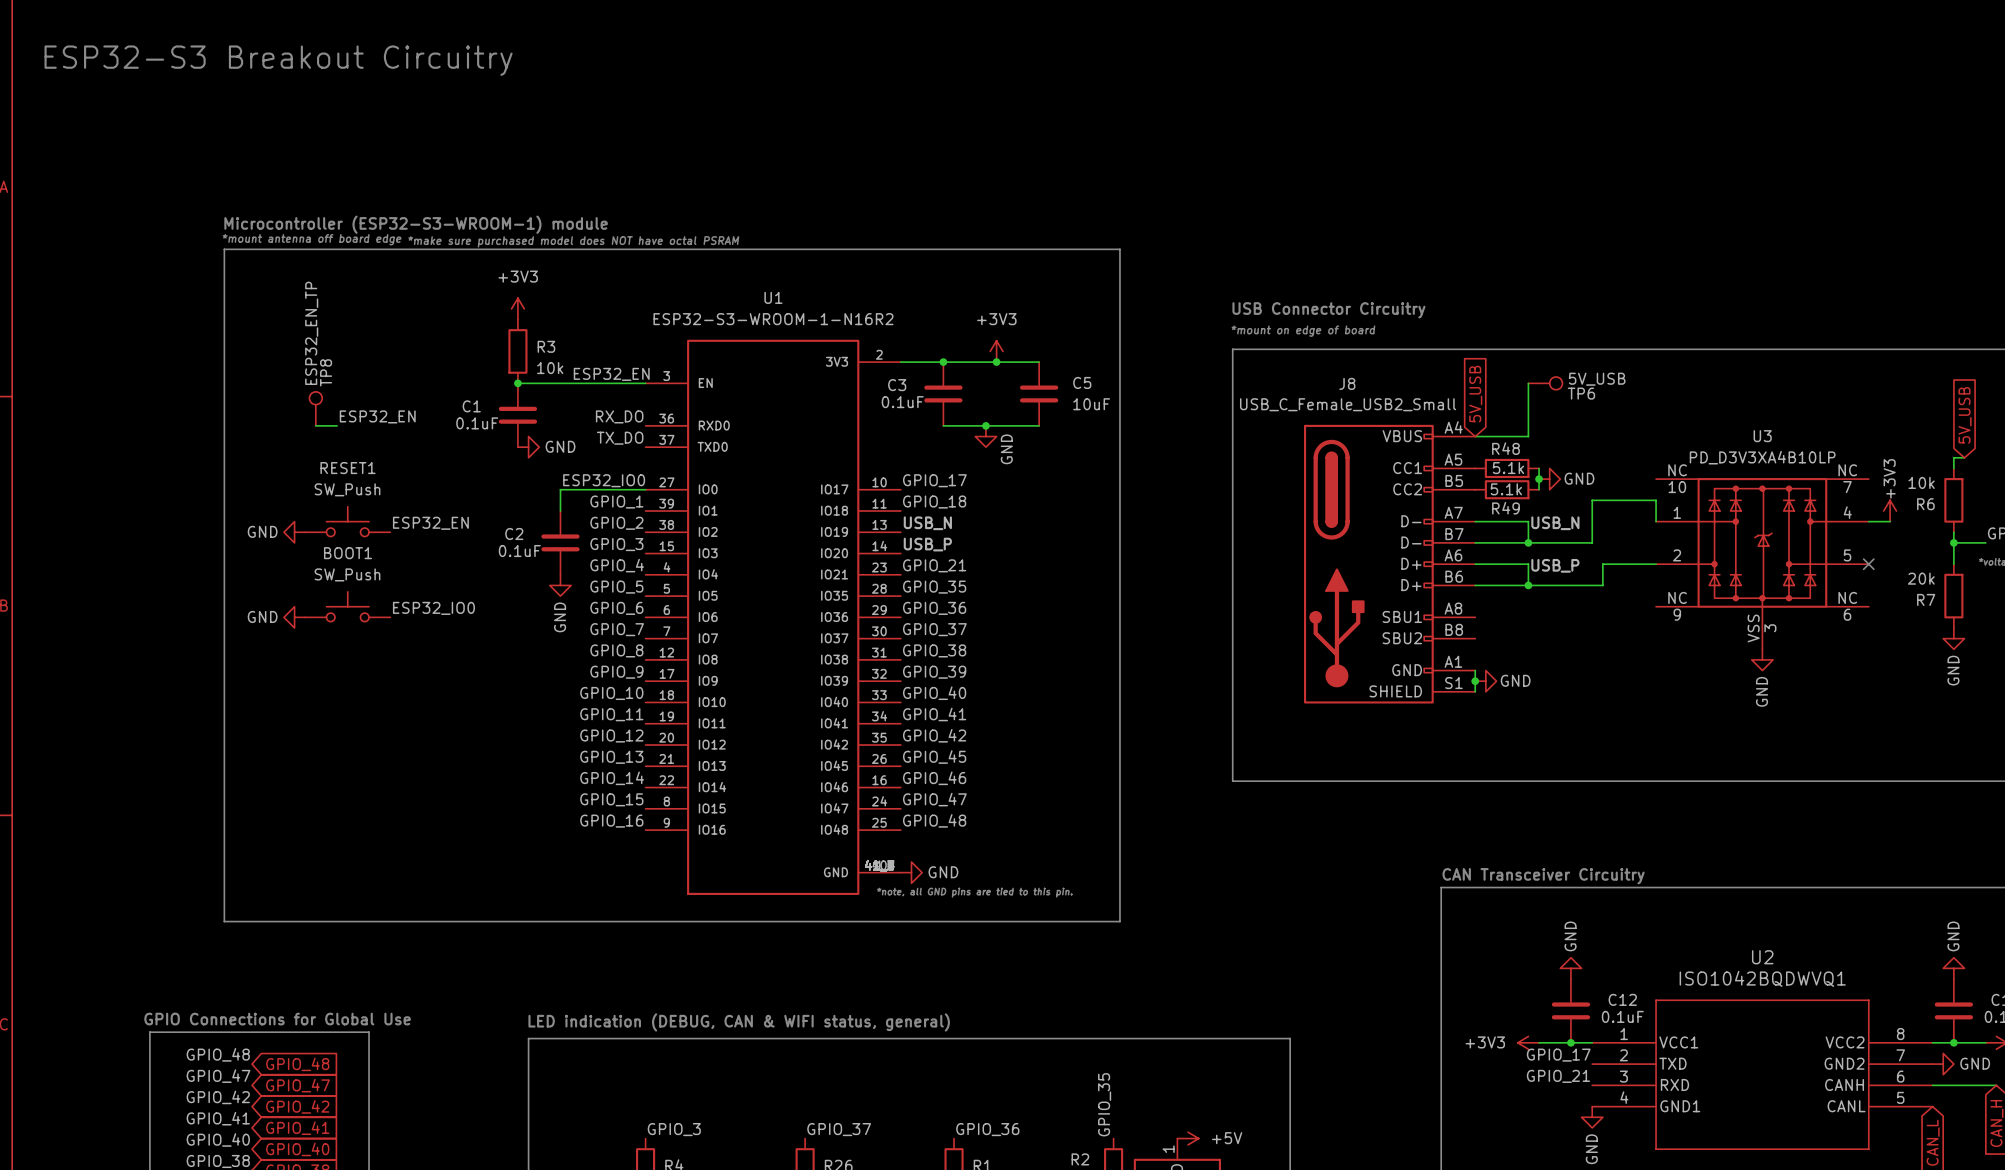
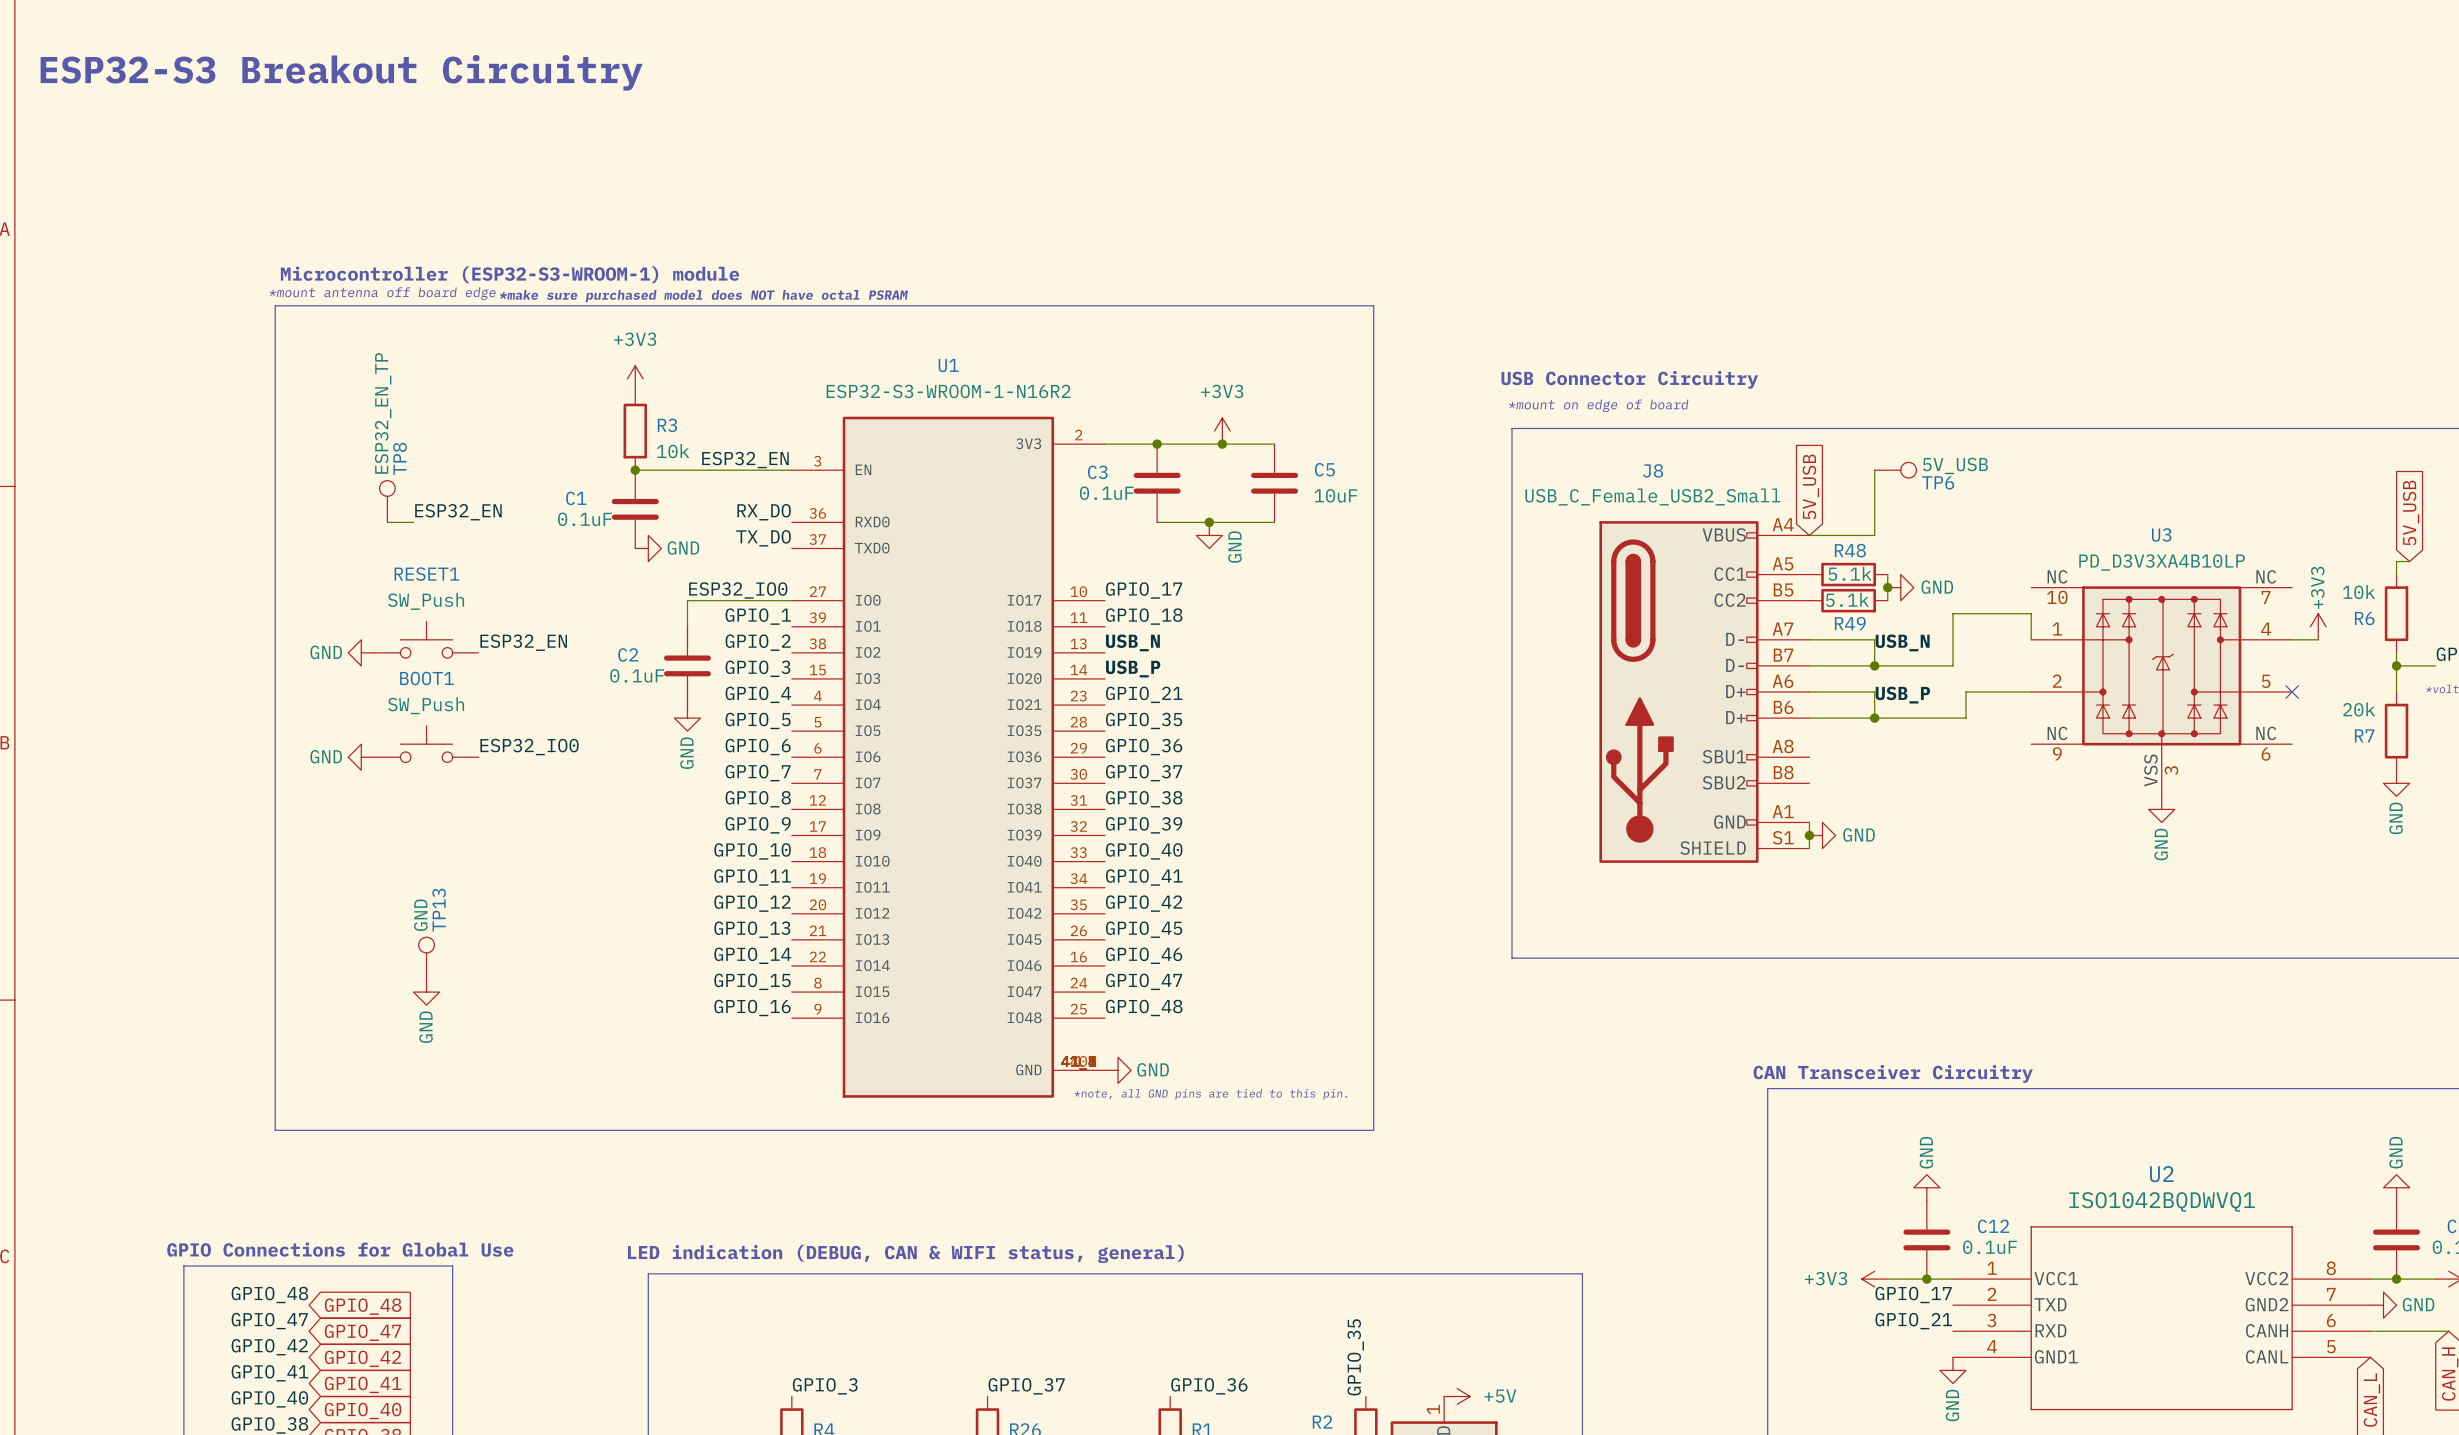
TP13: none -> GND (426, 958)
power symbol: none -> GND (426, 992)

